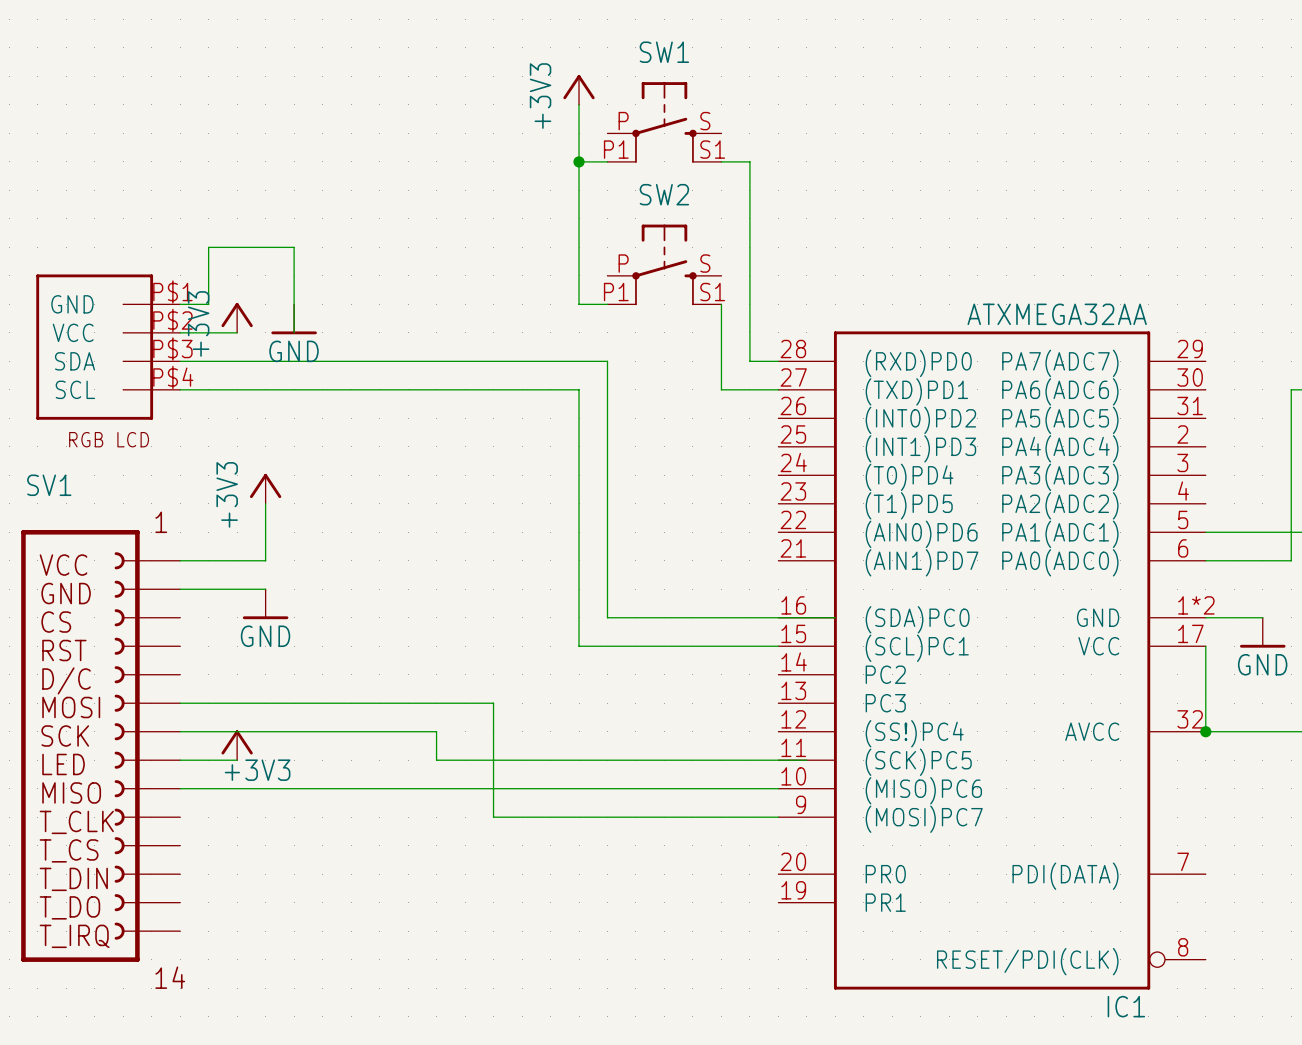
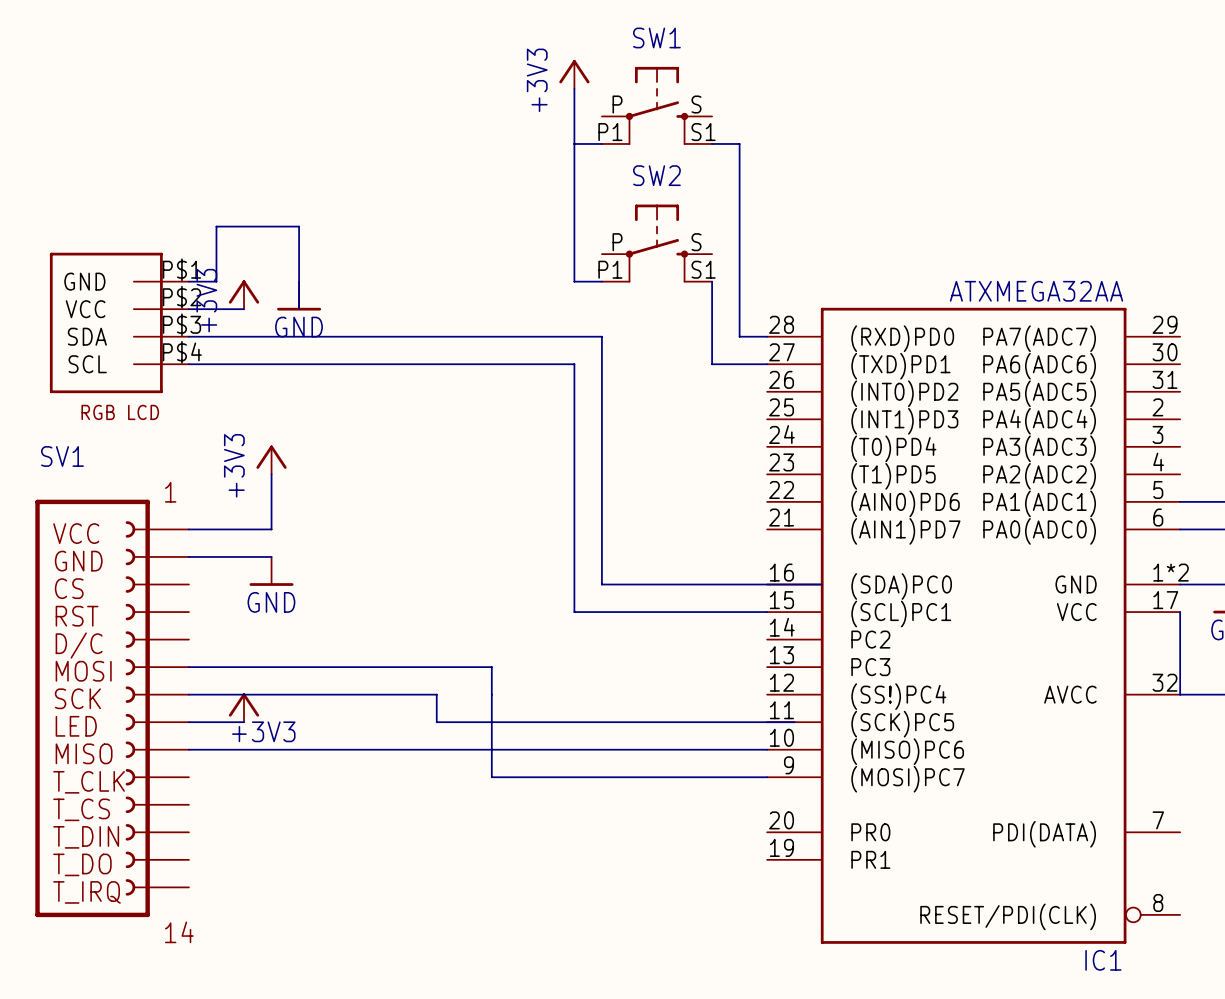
junction: (579, 161) -> none
junction: (1205, 731) -> none

